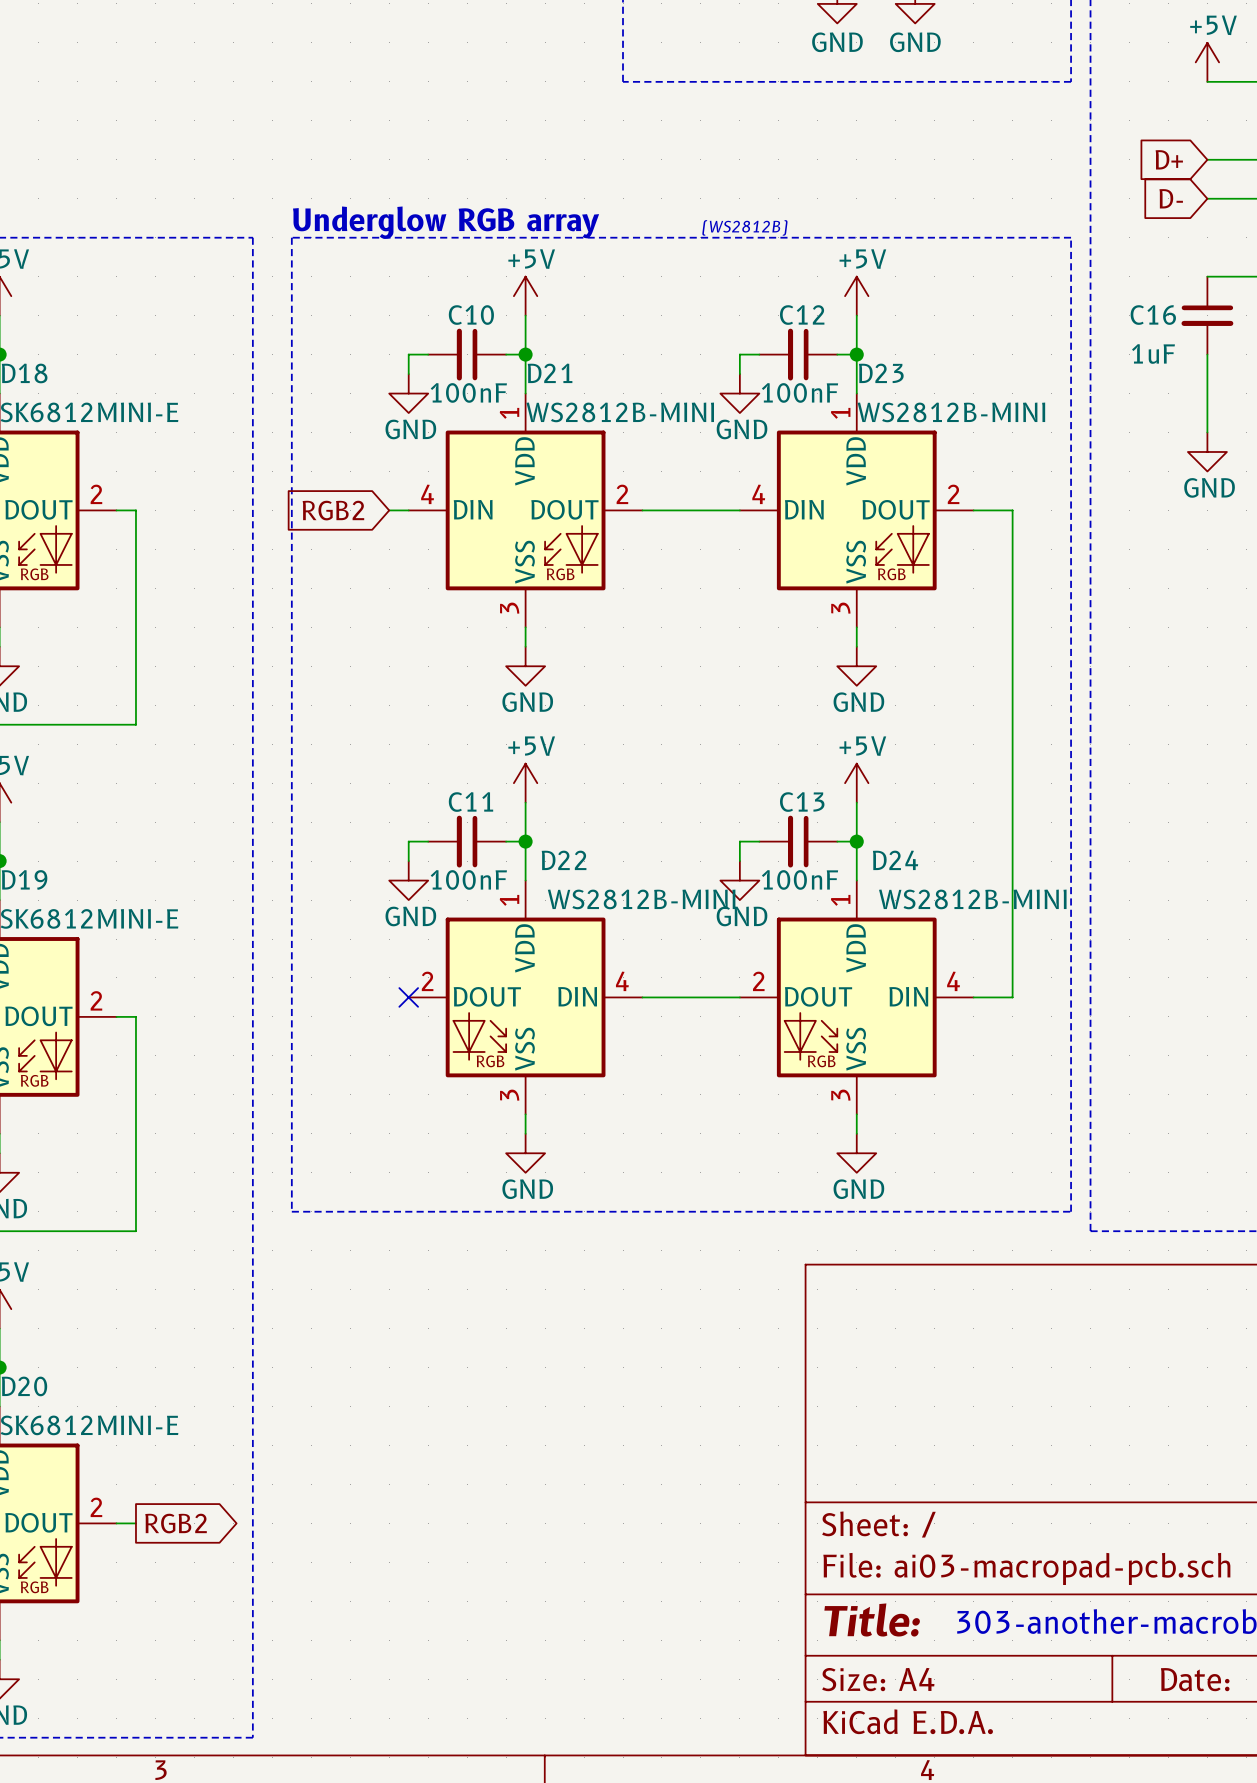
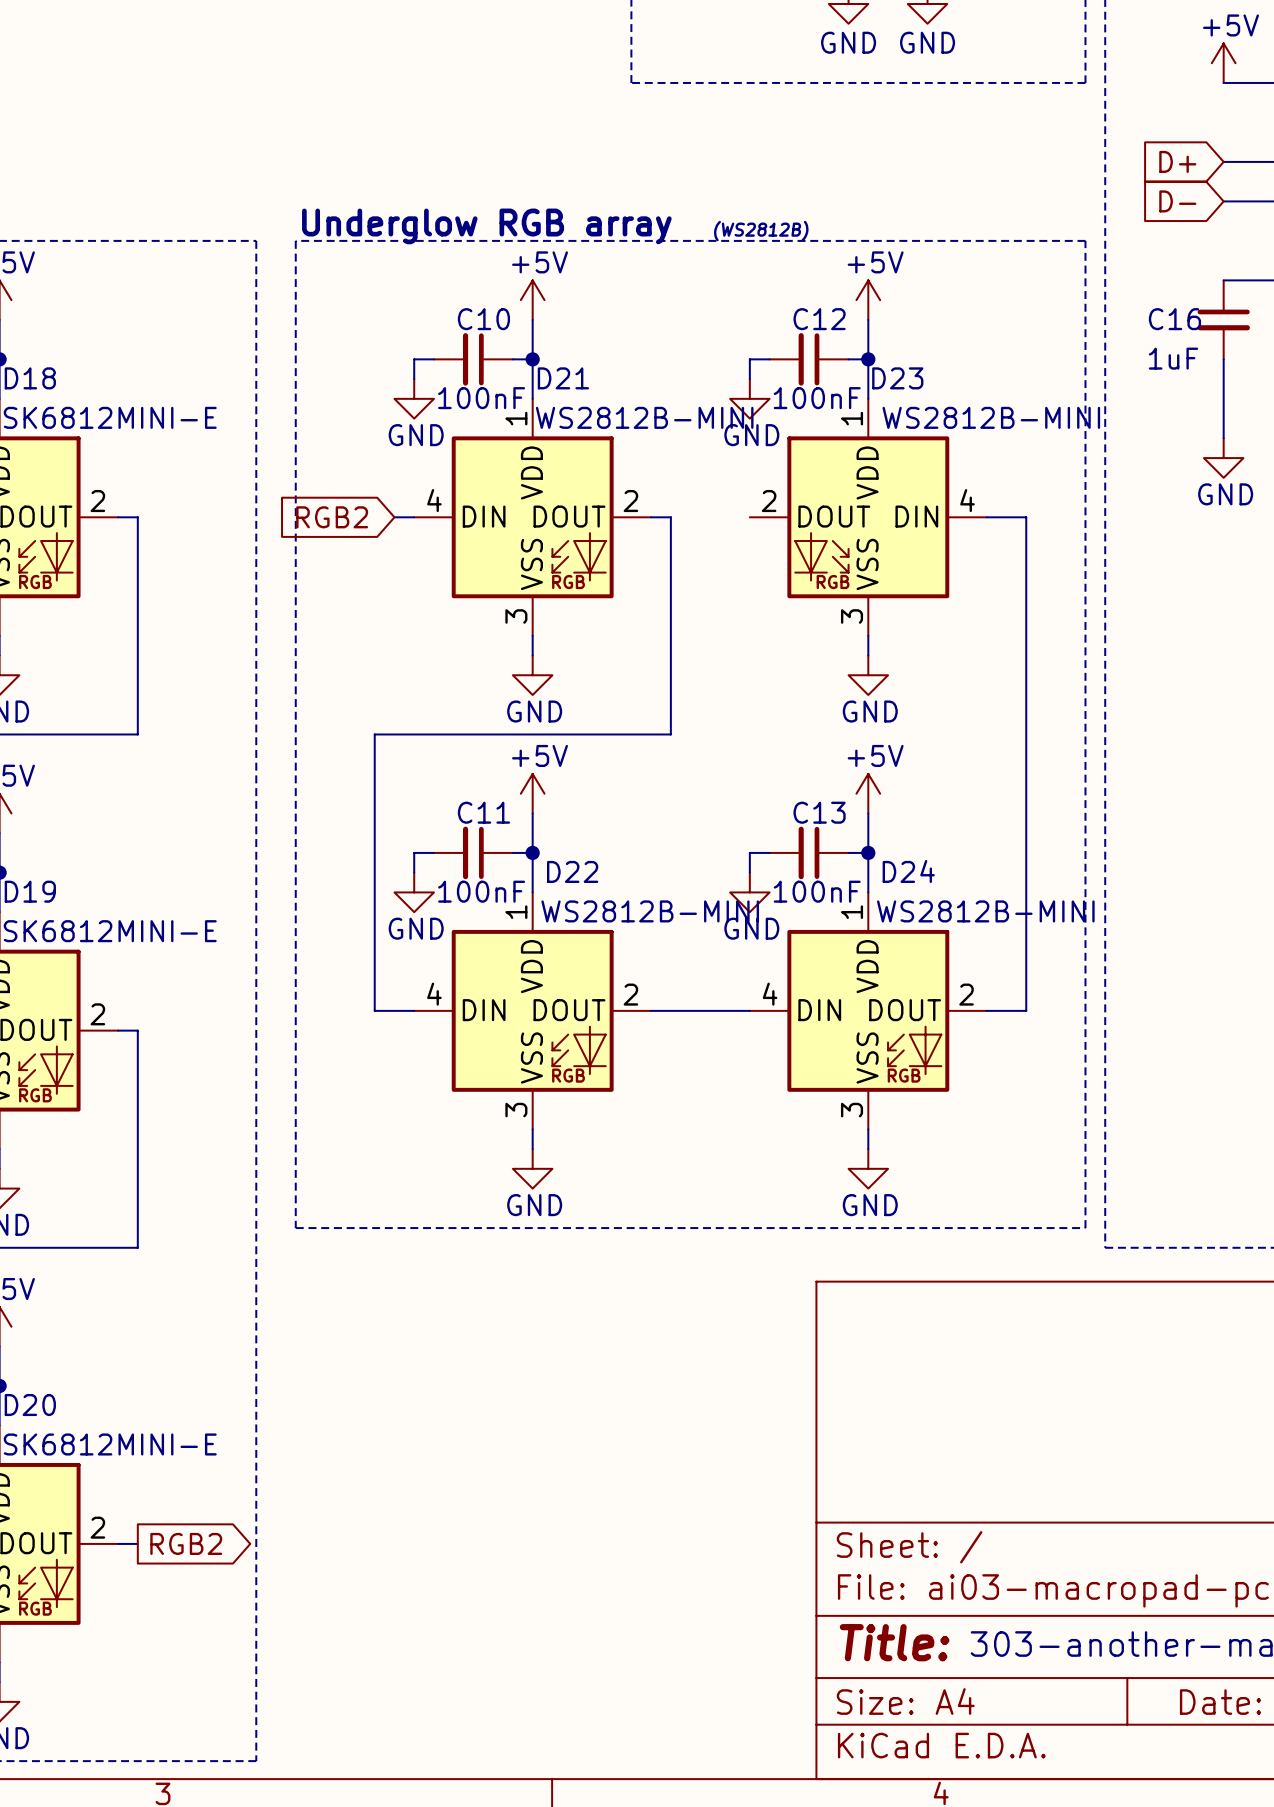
wire: (661, 510) (739, 510) -> (670, 517) (670, 734) (374, 734) (374, 1010) (414, 1010)
D23 flip: as is (856, 510) -> left-right (868, 517)
no-connect mark: (408, 997) -> none
D22 flip: as is (525, 997) -> left-right (532, 1010)
D24 flip: as is (856, 997) -> left-right (868, 1010)

